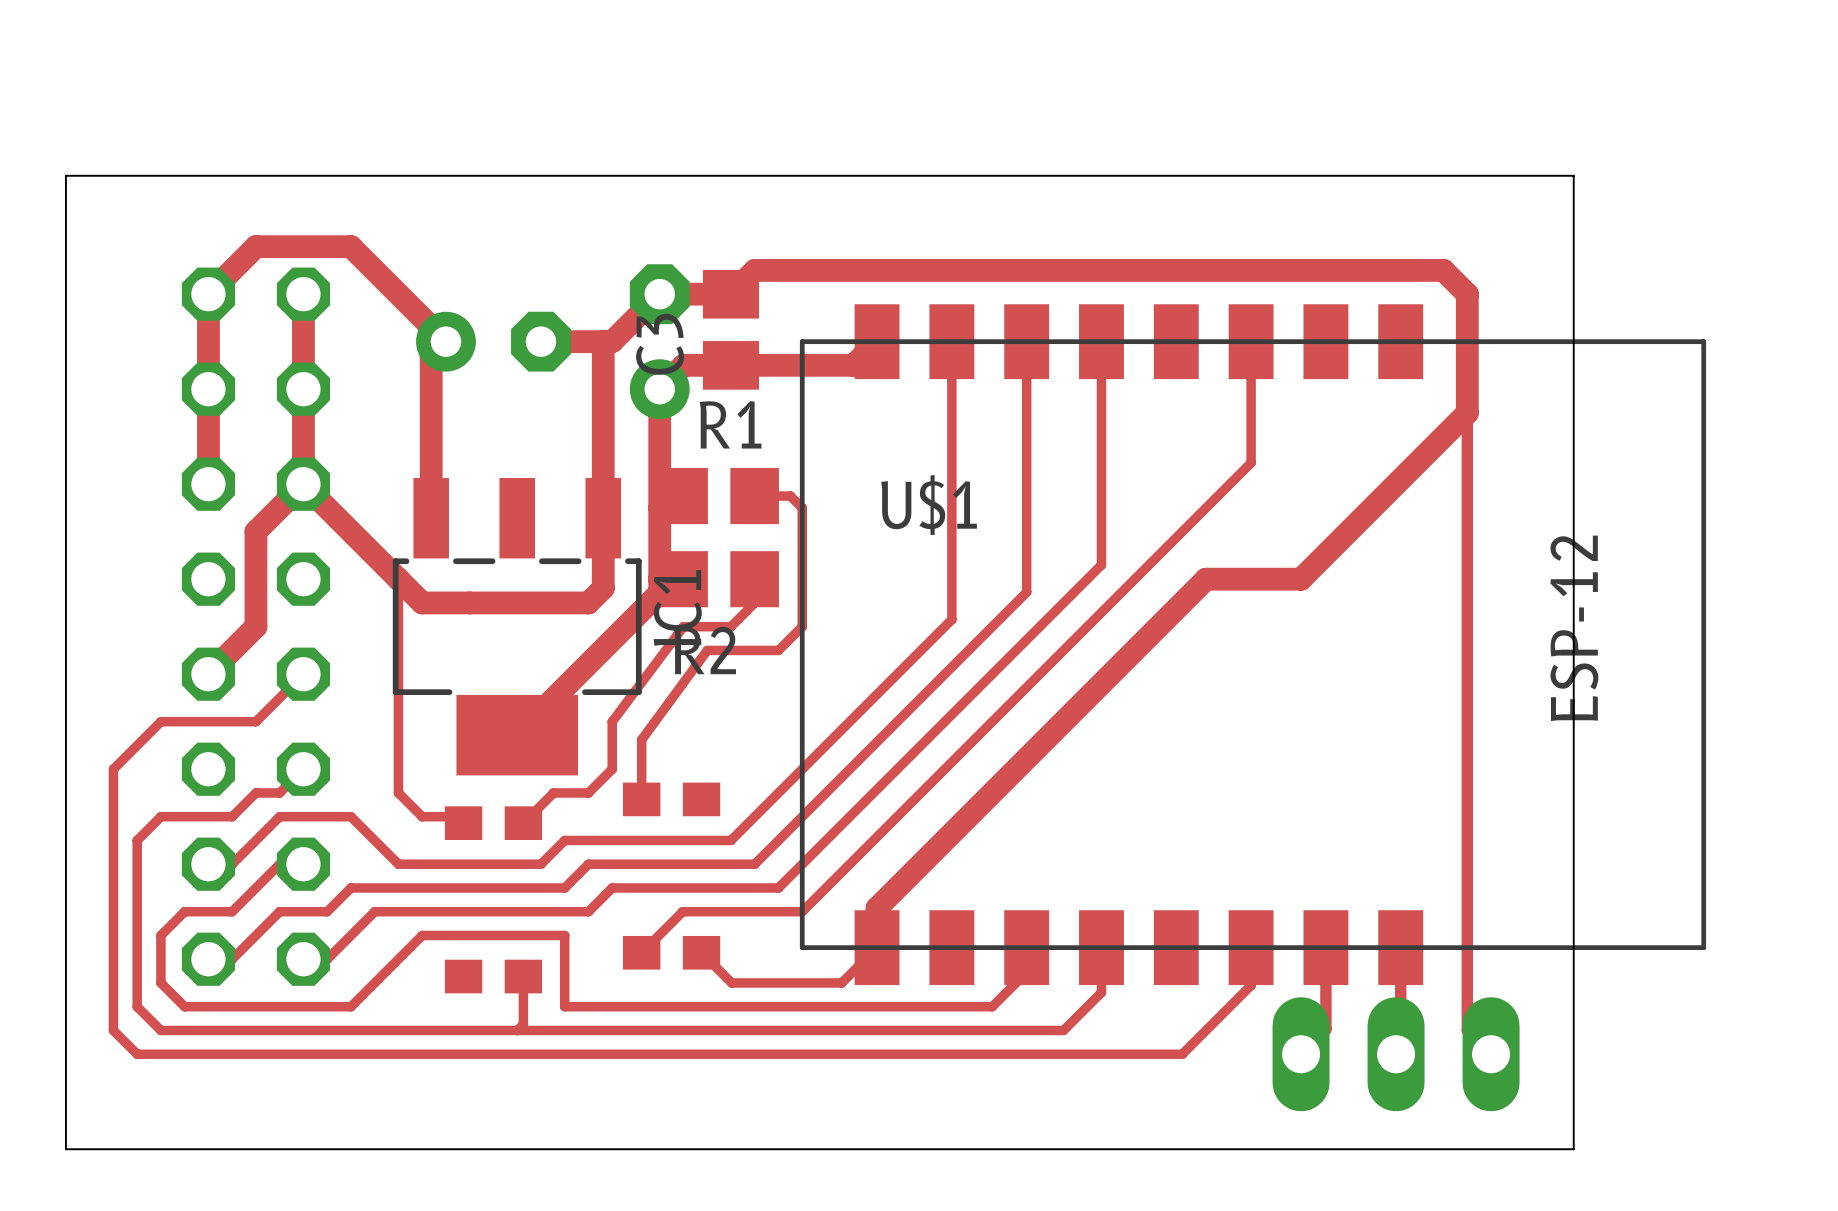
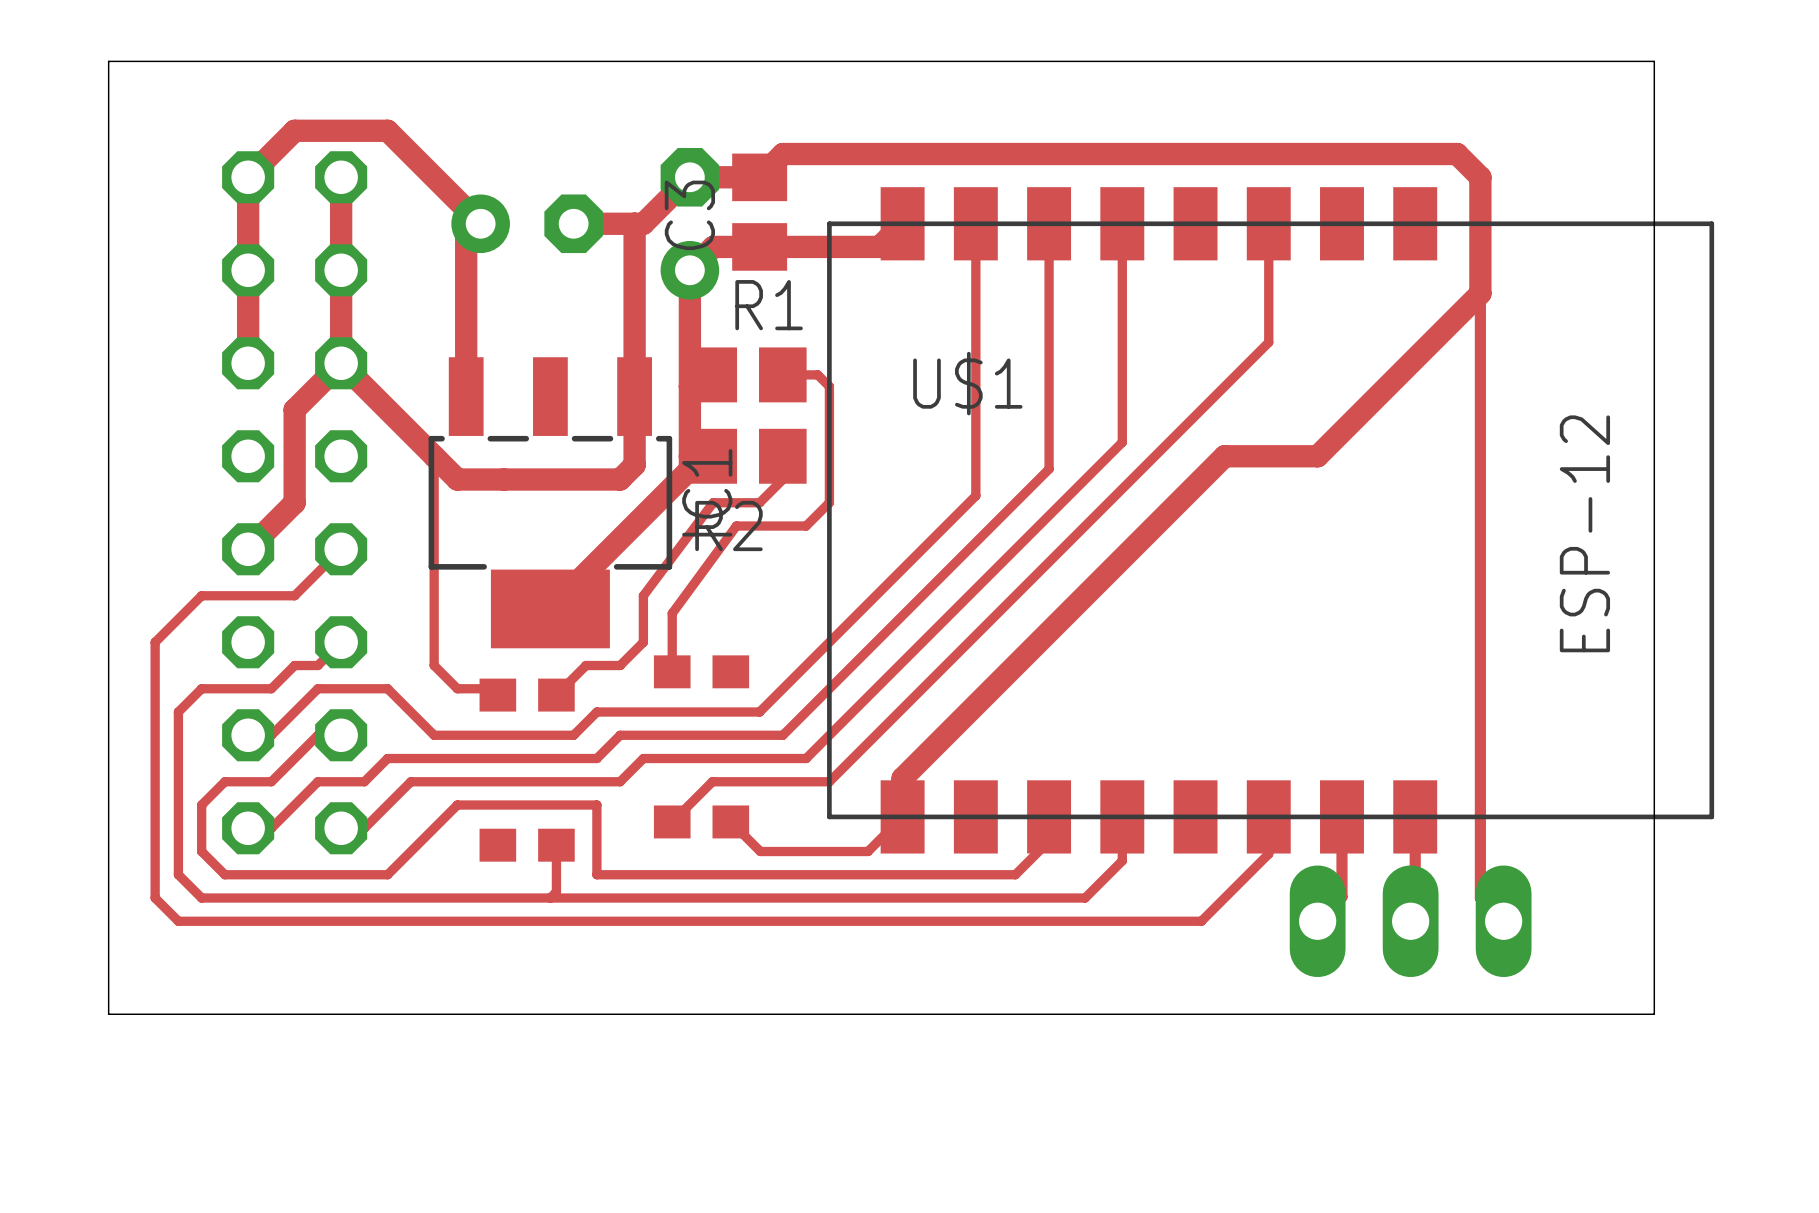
board edge: (1573, 175) (1573, 1149) -> (1584, 61) (1654, 61) (1654, 1014) (1584, 1014)

